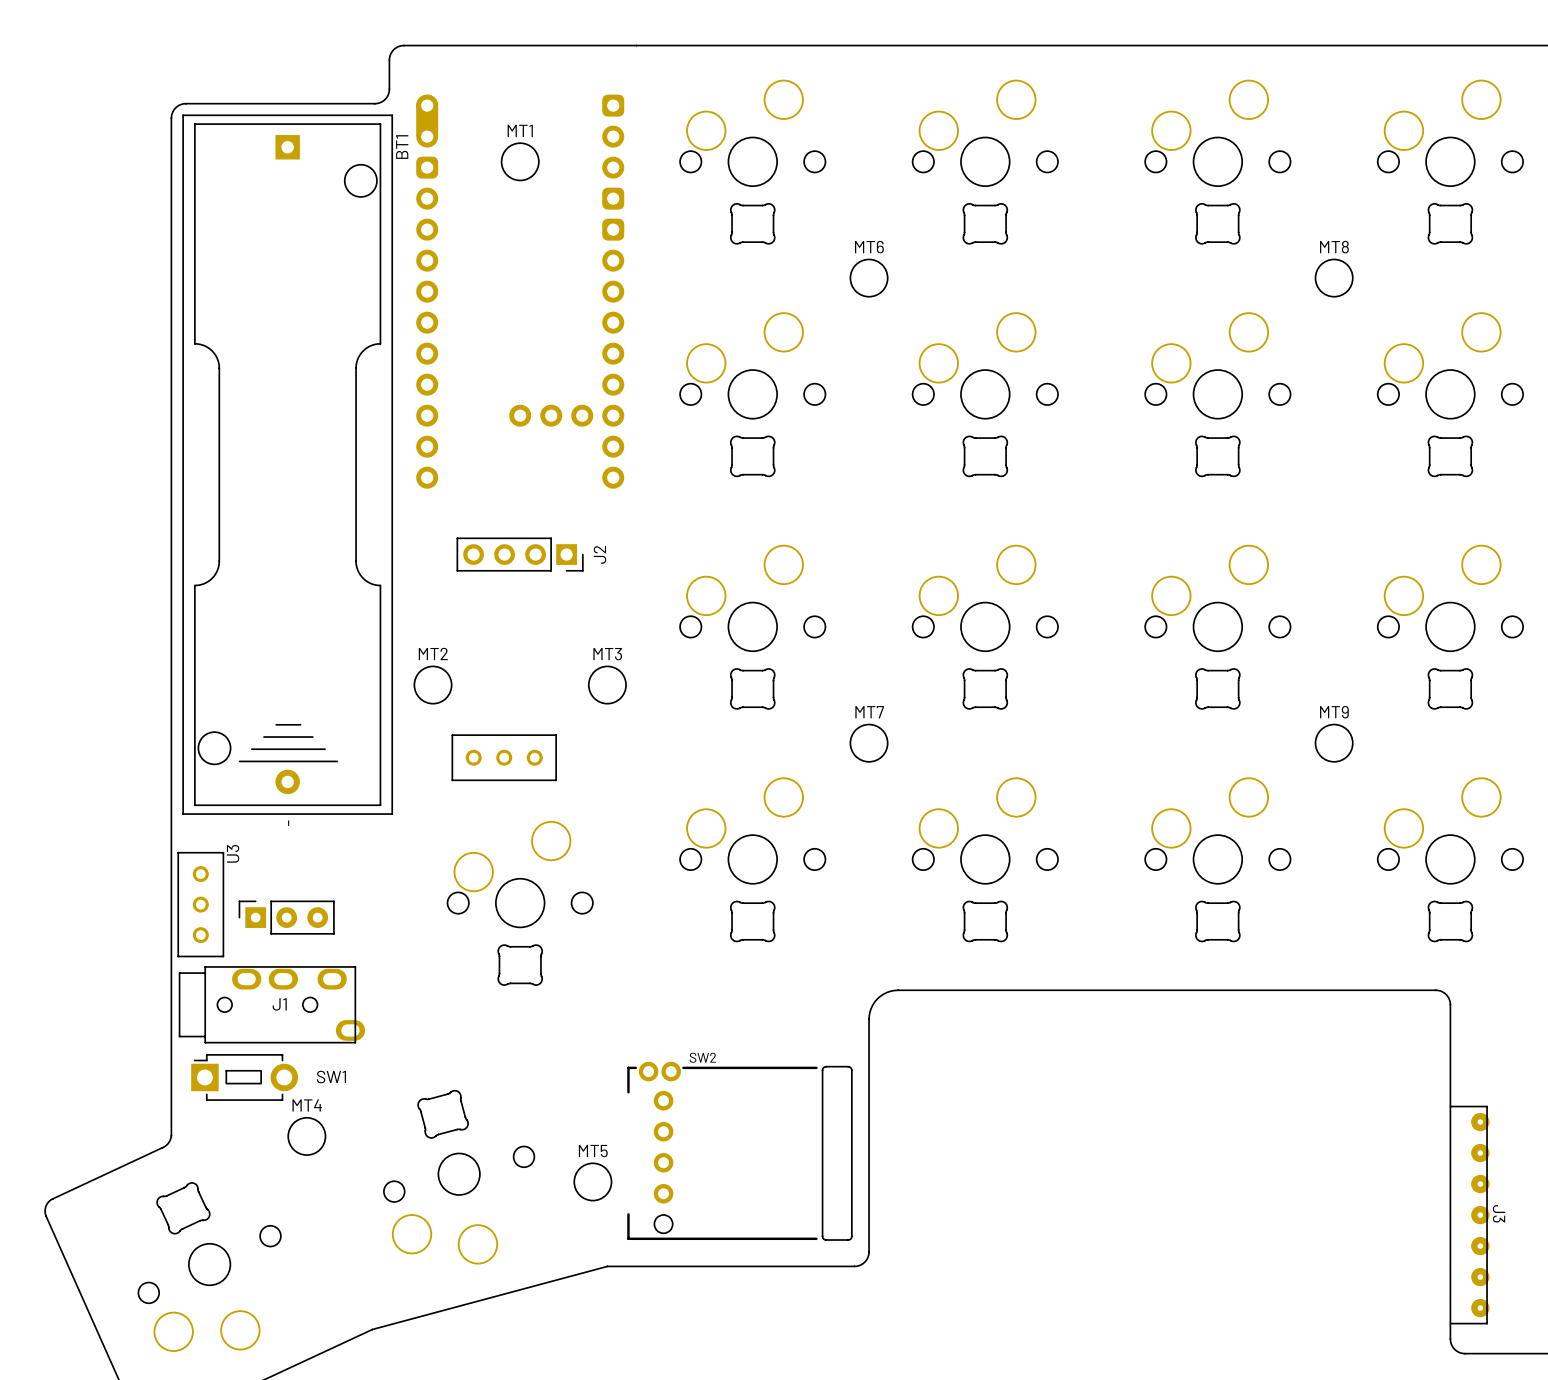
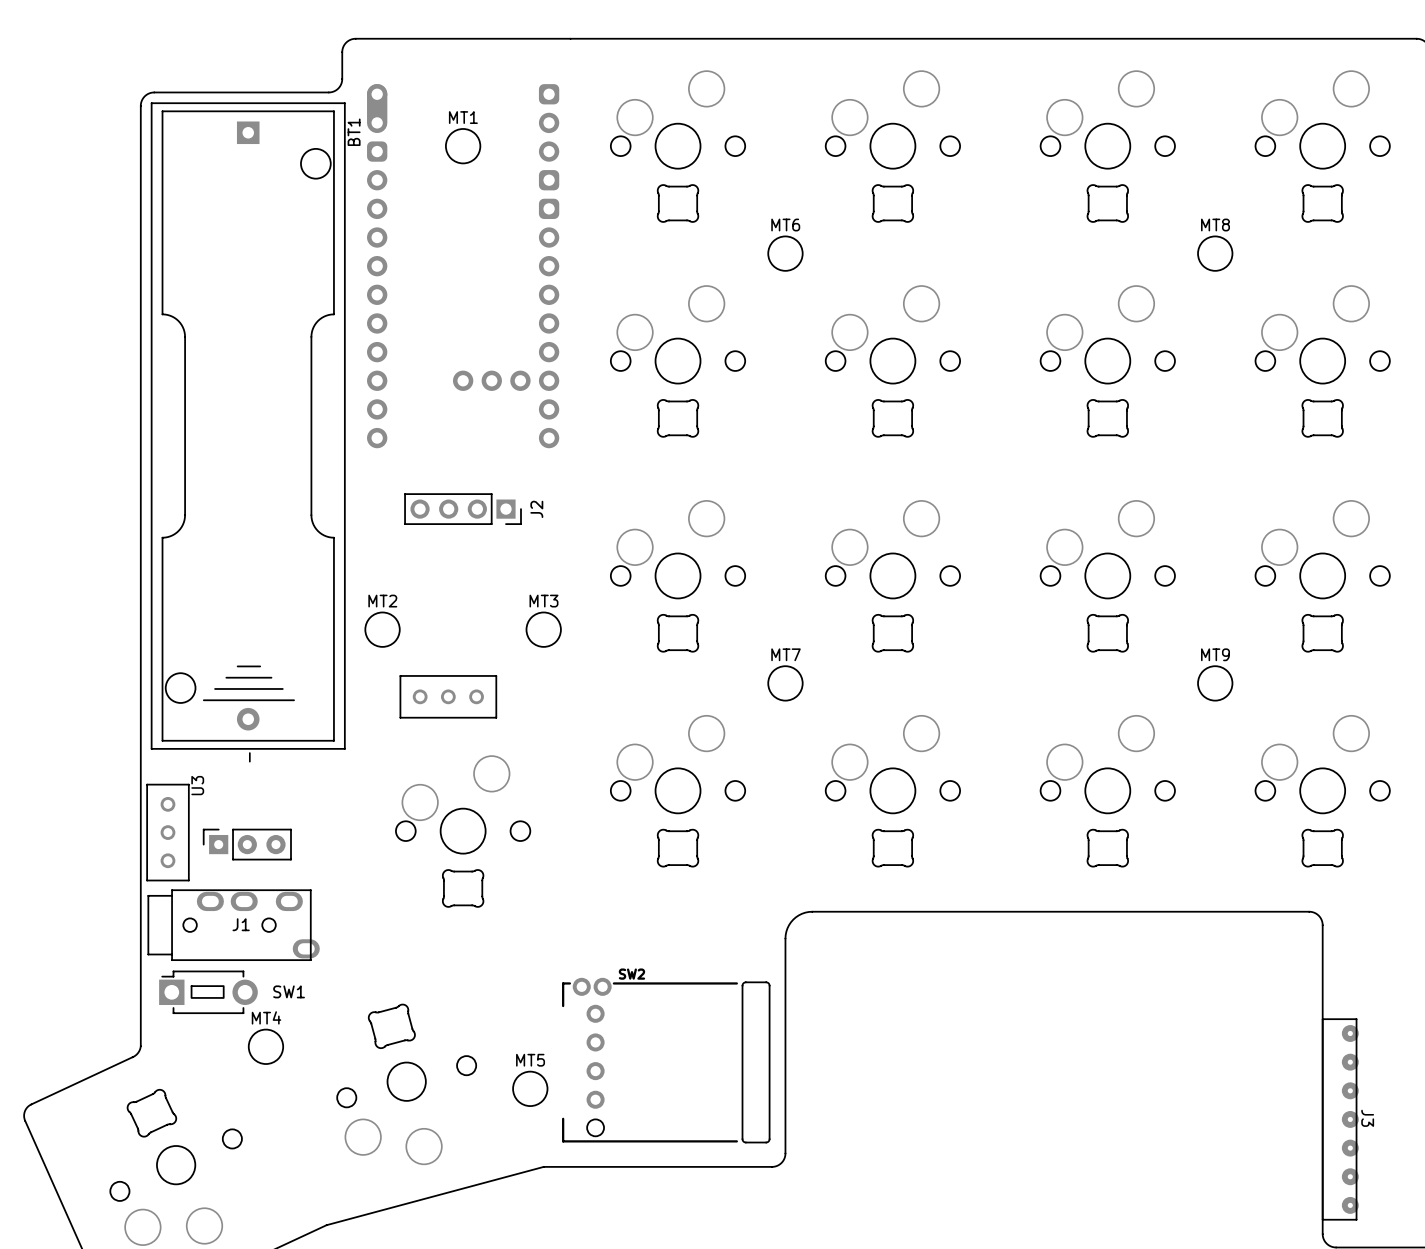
J3 footprint: [1449, 1105, 1490, 1325] -> [1322, 1018, 1359, 1221]

